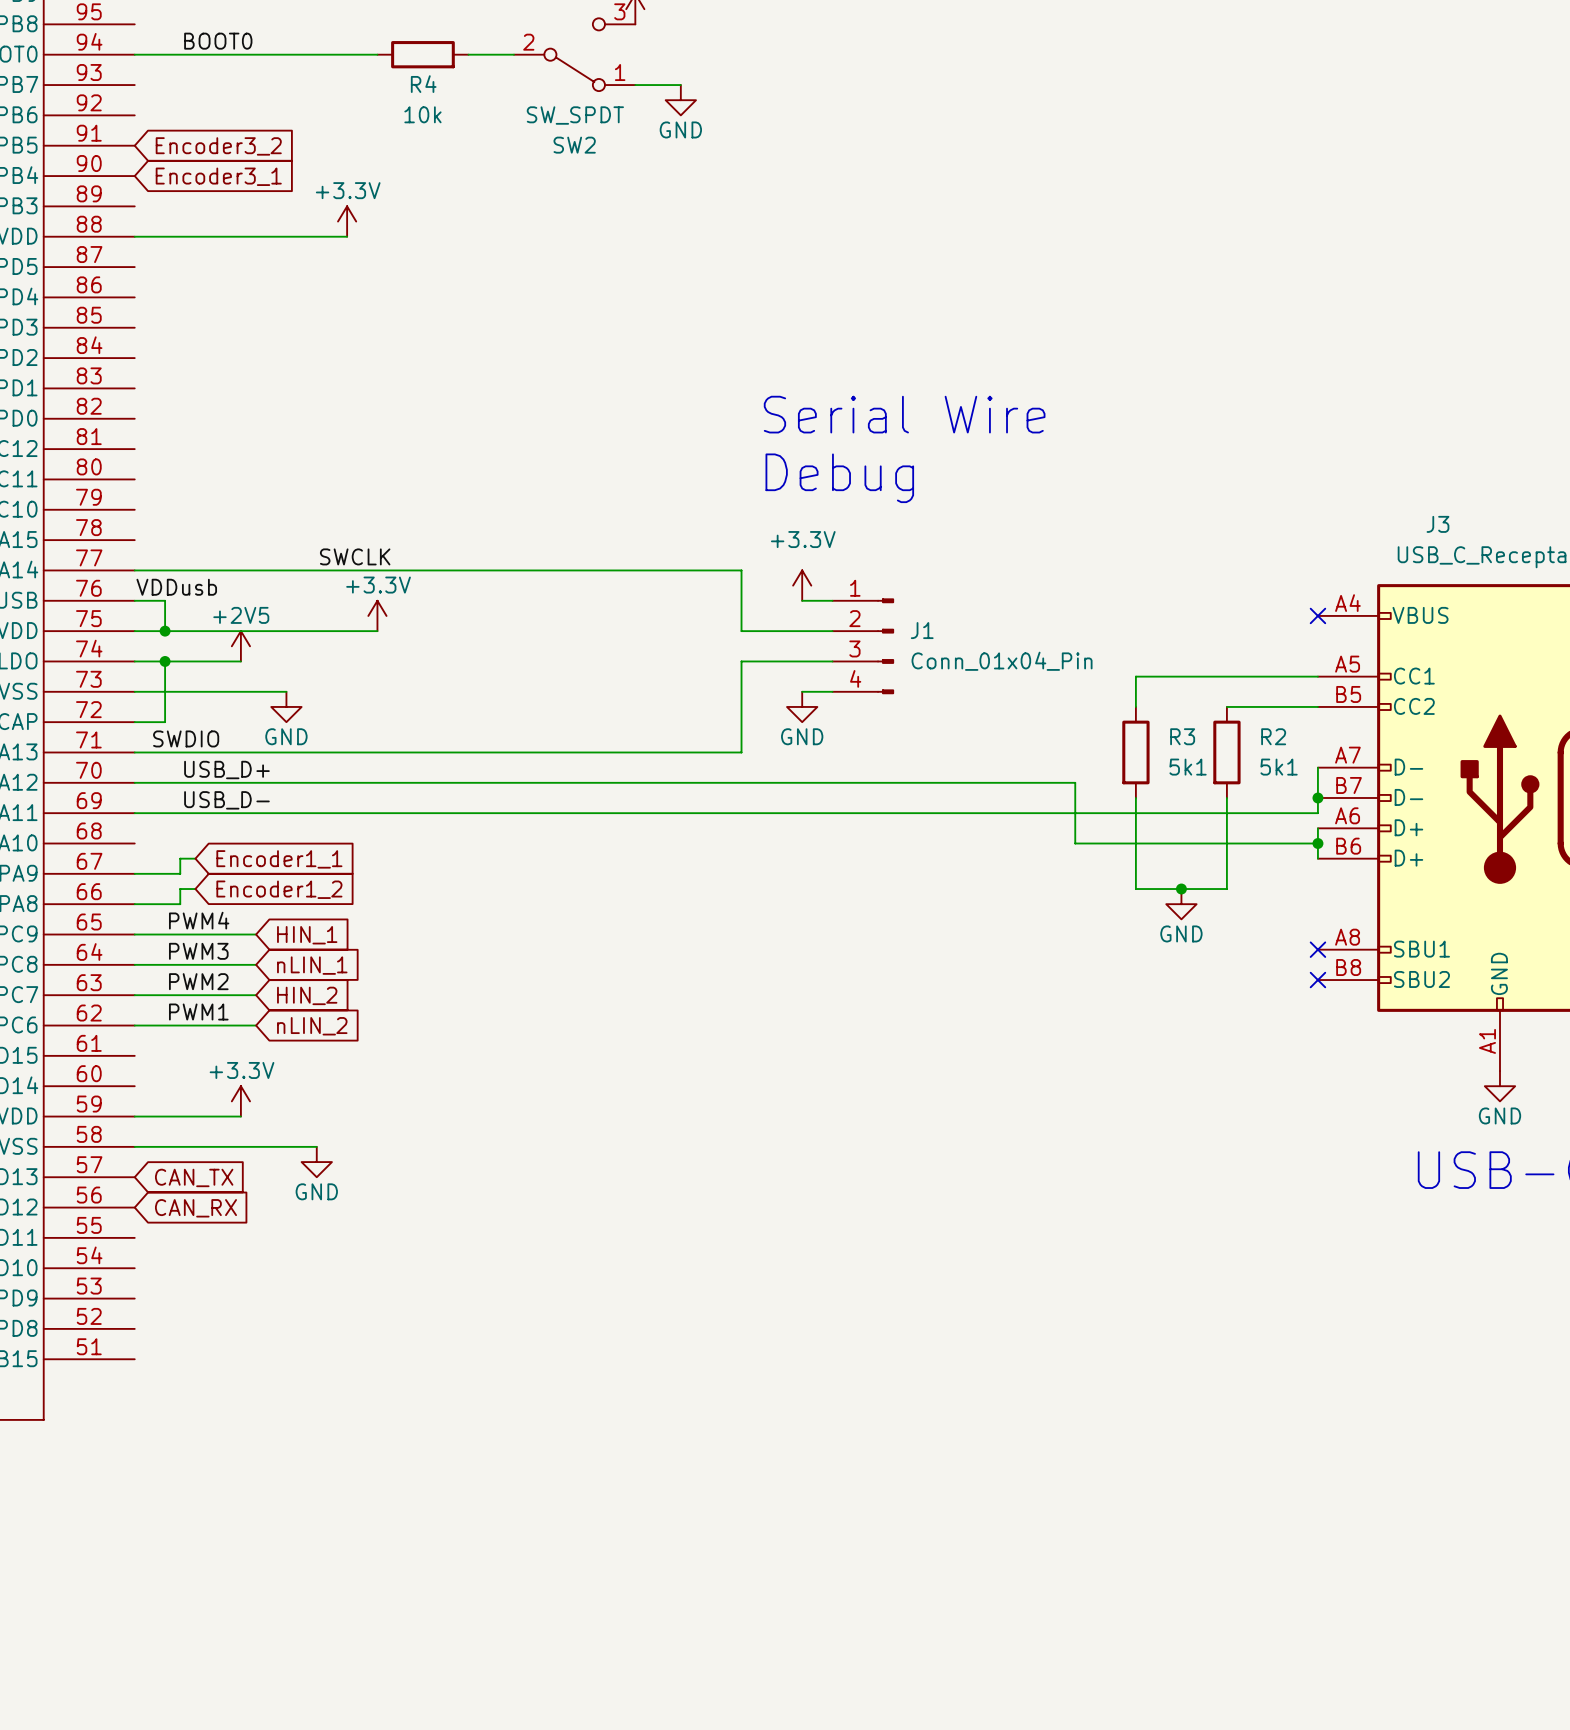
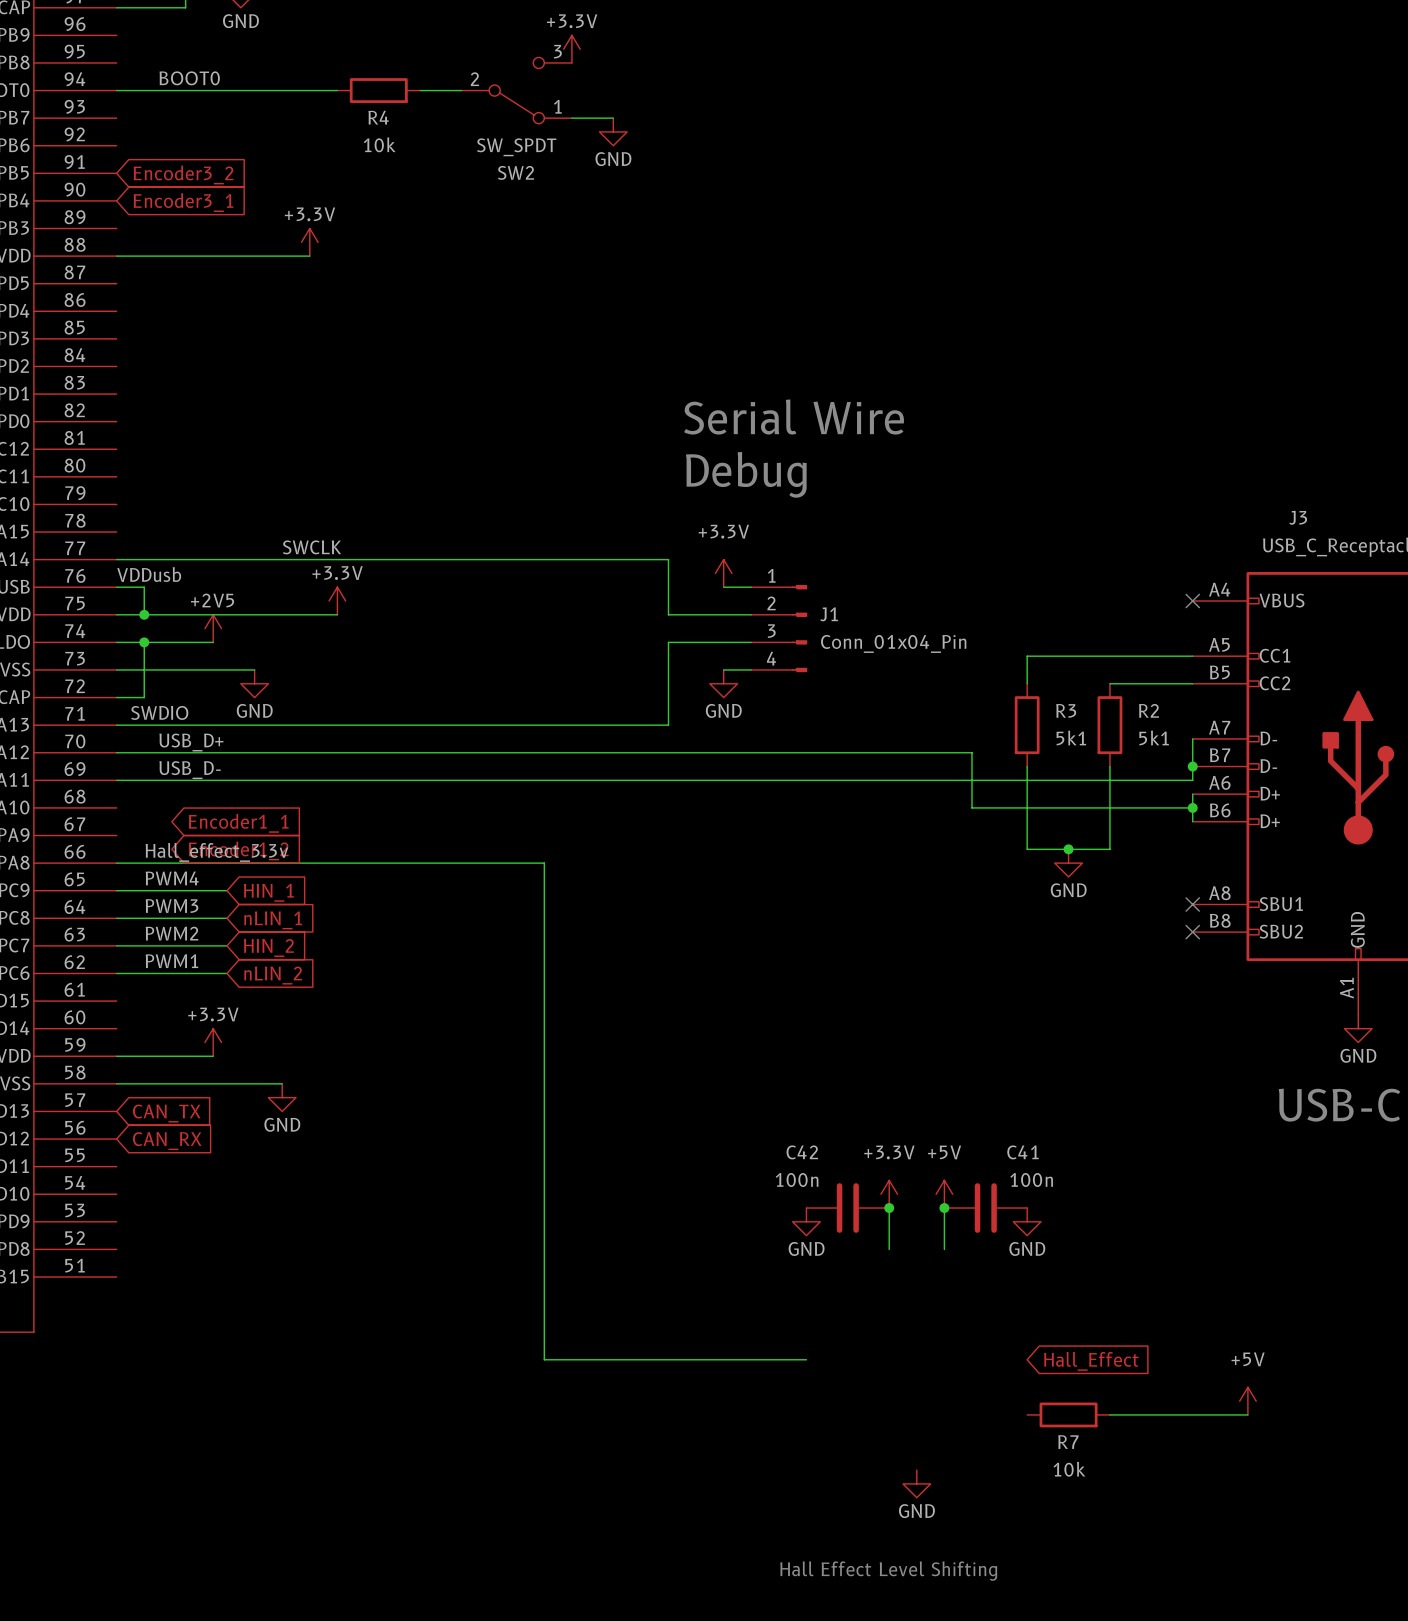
wire: (195, 858) (180, 858) (180, 873) (134, 873) -> none
wire: (195, 889) (180, 889) (180, 904) -> (806, 1359) (544, 1359) (544, 863) (158, 863)
label: none -> Hall_effect_3.3v (216, 852)
power symbol: none -> +3.3V (889, 1194)
power symbol: none -> +5V (944, 1194)
C42: none -> 100n (847, 1208)
wire: none -> (889, 1208) (889, 1249)
junction: none -> (889, 1208)
wire: none -> (944, 1208) (944, 1249)
junction: none -> (944, 1208)
C41: none -> 100n (985, 1208)
power symbol: none -> GND (806, 1221)
power symbol: none -> GND (1027, 1221)
global label: none -> Hall_Effect (1091, 1361)
power symbol: none -> +5V (1247, 1401)
R7: none -> 10k (1068, 1414)
wire: none -> (1109, 1414) (1247, 1414)
power symbol: none -> GND (916, 1483)
text: none -> Hall Effect Level Shifting (888, 1571)

